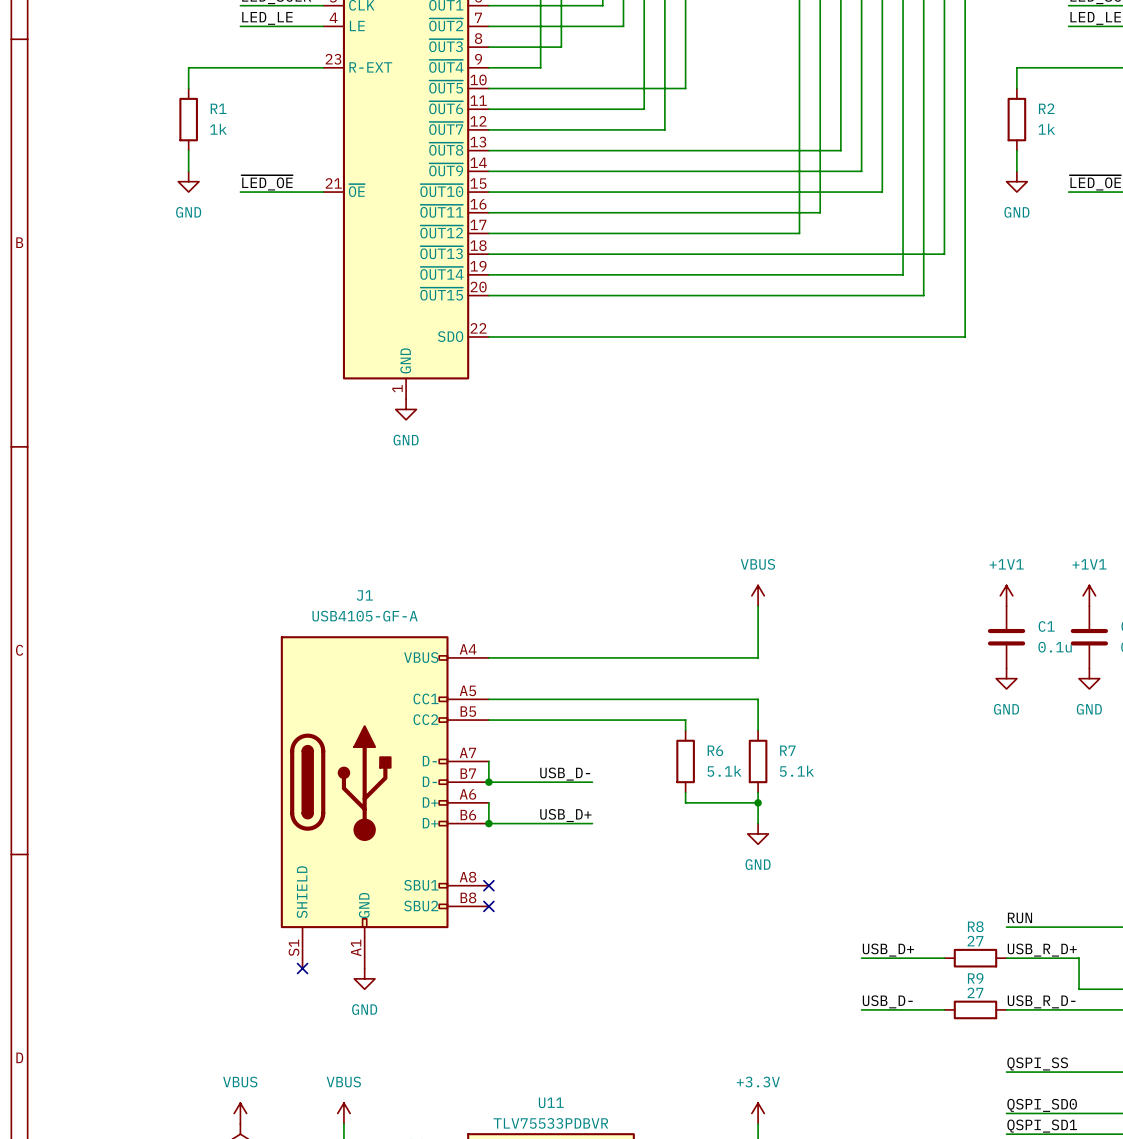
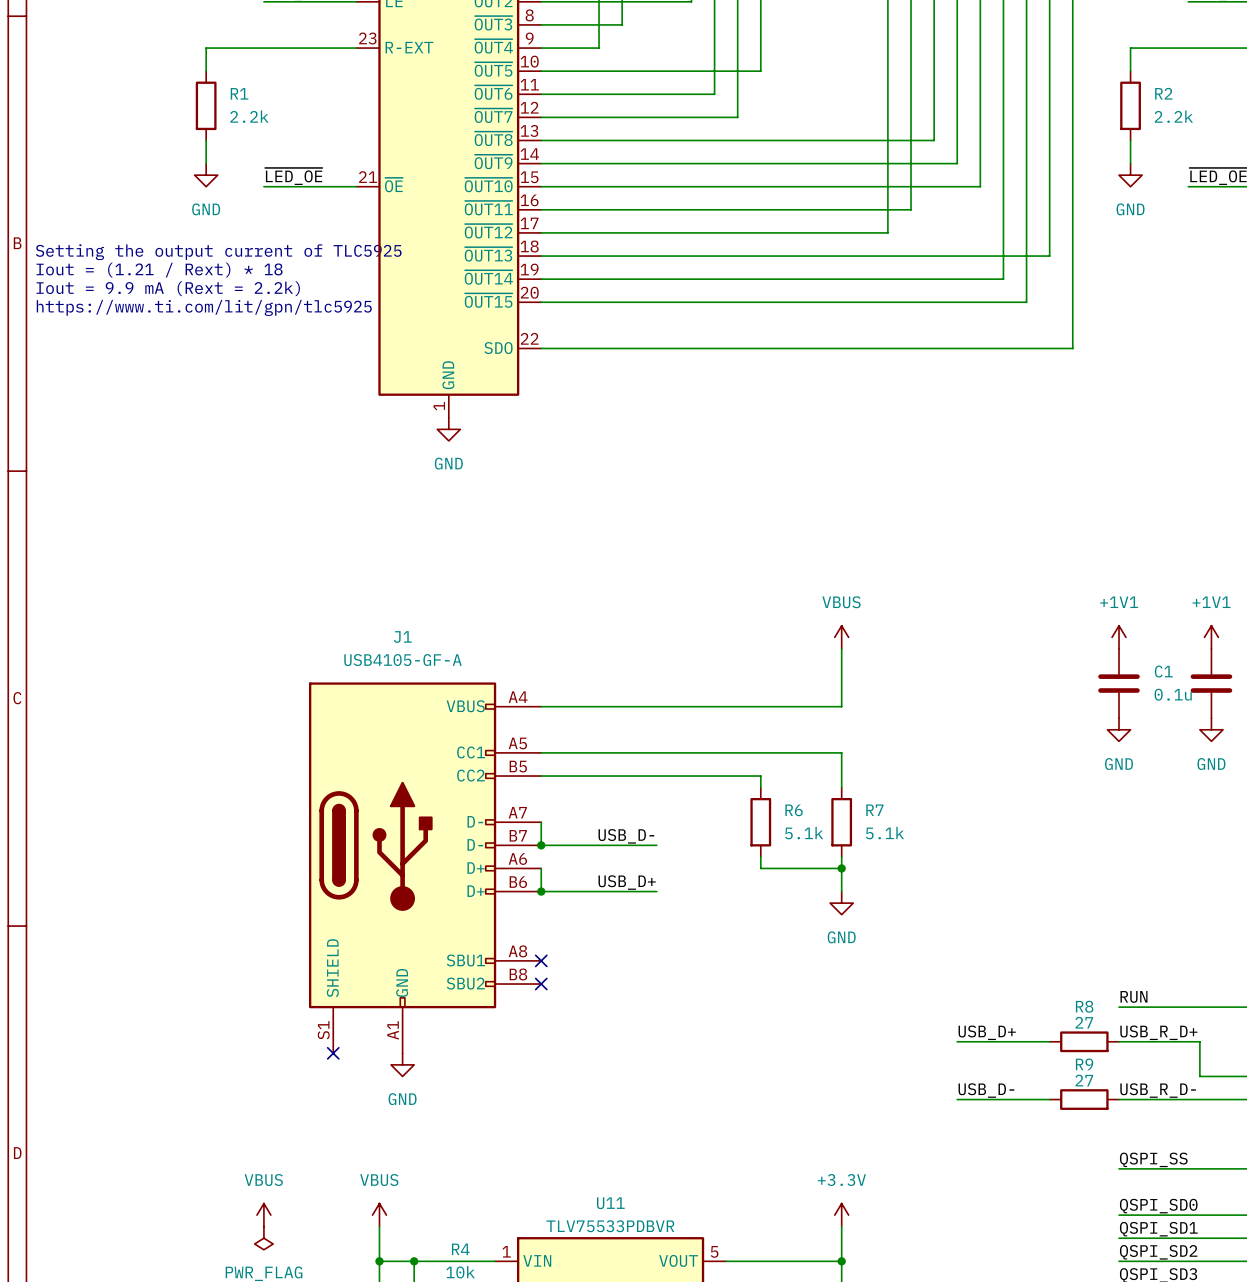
R1 value: 1k (218, 129) -> 2.2k (249, 116)
R2 value: 1k (1046, 129) -> 2.2k (1173, 116)
text: none -> Setting the output current of TLC5925 (218, 252)
text: none -> Iout = (1.21 / Rext) * 18 (159, 270)
text: none -> Iout = 9.9 mA (Rext = 2.2k) (168, 288)
text: none -> https://www.ti.com/lit/gpn/tlc5925 (204, 307)

